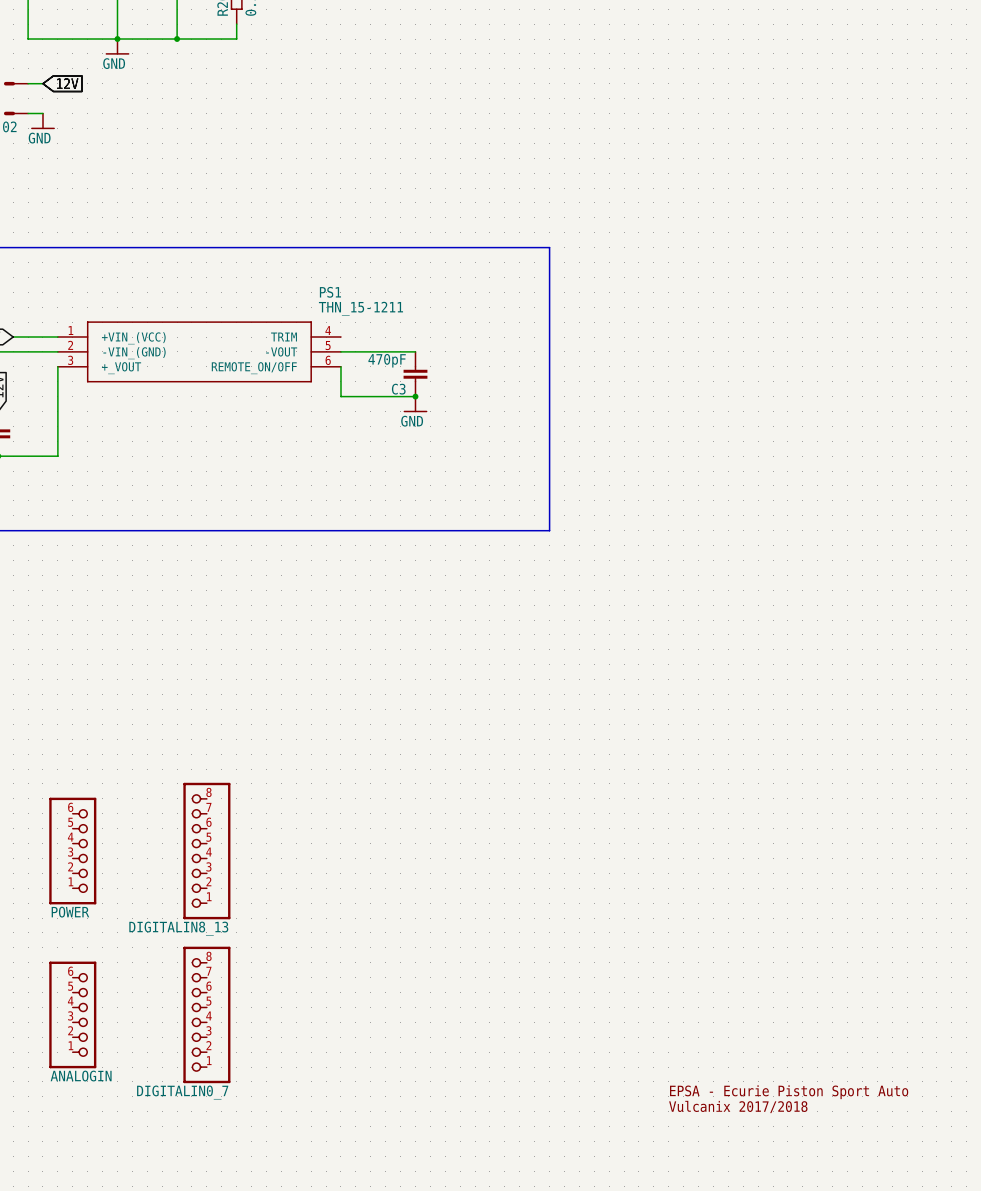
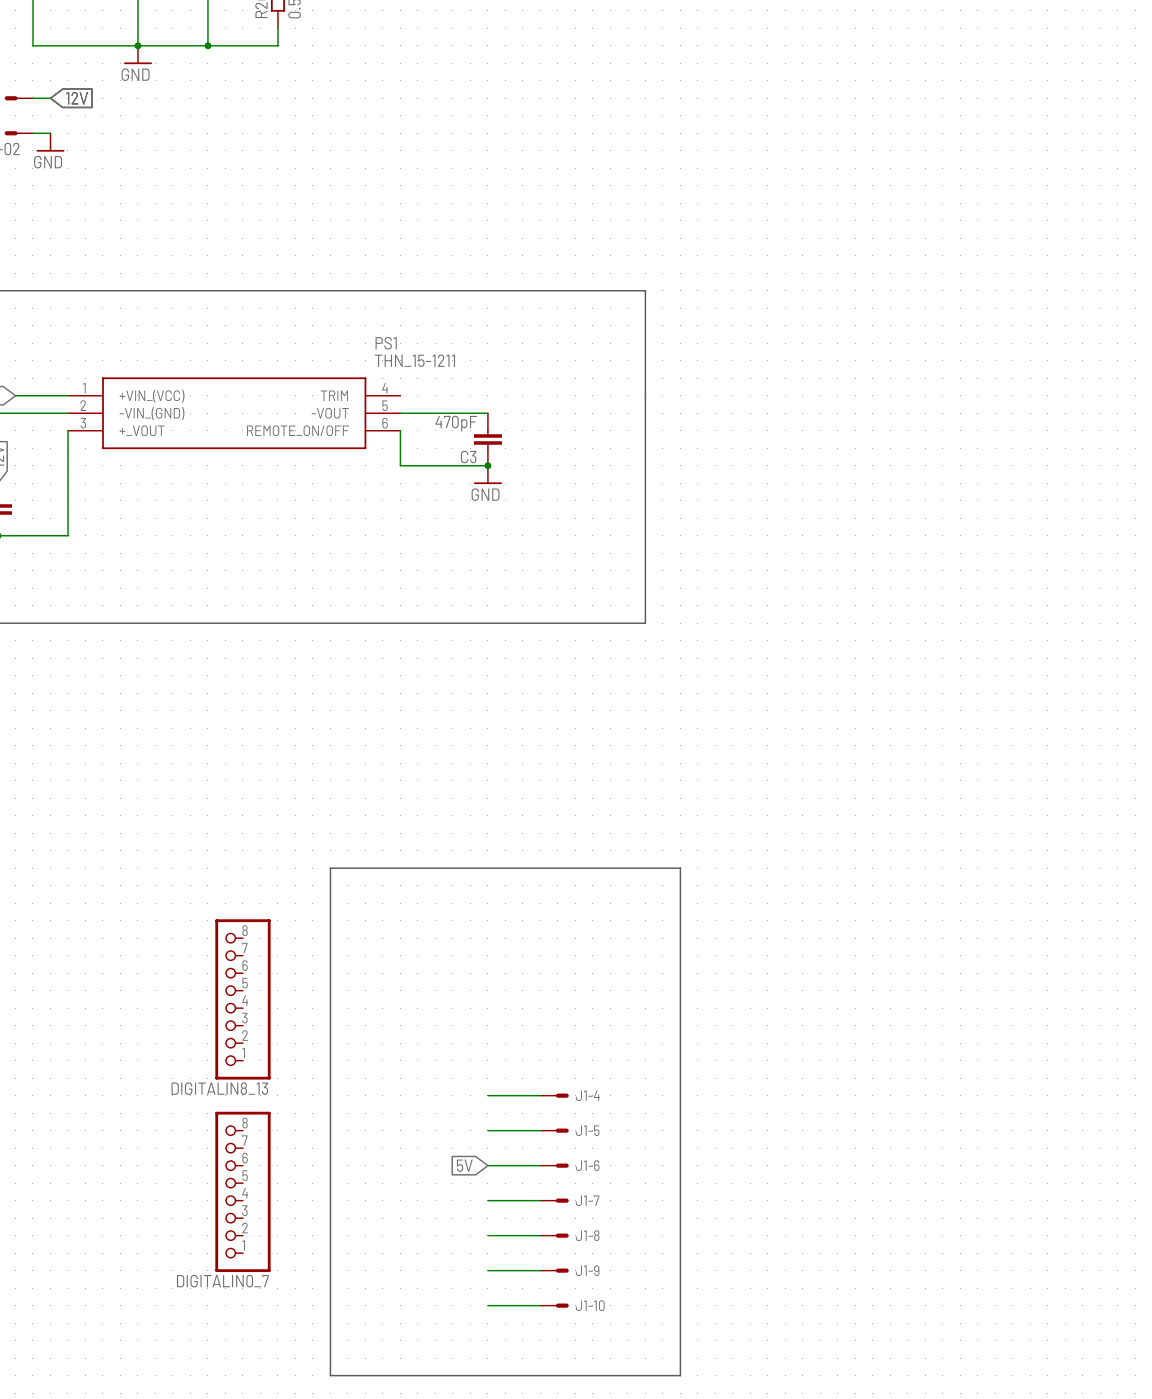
line: none -> (330, 868) (680, 868) (680, 1375) (330, 1375) (330, 868)
POWER: (72, 851) -> none
wire: none -> (487, 1095) (540, 1095)
J1-4: none -> (554, 1095)
wire: none -> (487, 1130) (540, 1130)
J1-5: none -> (554, 1130)
global label: none -> 5V (464, 1165)
wire: none -> (487, 1165) (540, 1165)
J1-6: none -> (554, 1165)
ANALOGIN: (72, 1014) -> none
wire: none -> (487, 1200) (540, 1200)
J1-7: none -> (554, 1200)
wire: none -> (487, 1235) (540, 1235)
J1-8: none -> (554, 1235)
wire: none -> (487, 1270) (540, 1270)
J1-9: none -> (554, 1270)
text: EPSA - Ecurie Piston Sport Auto (789, 1092) -> none
text: Vulcanix 2017/2018 (738, 1106) -> none
wire: none -> (487, 1305) (540, 1305)
J1-10: none -> (554, 1305)

